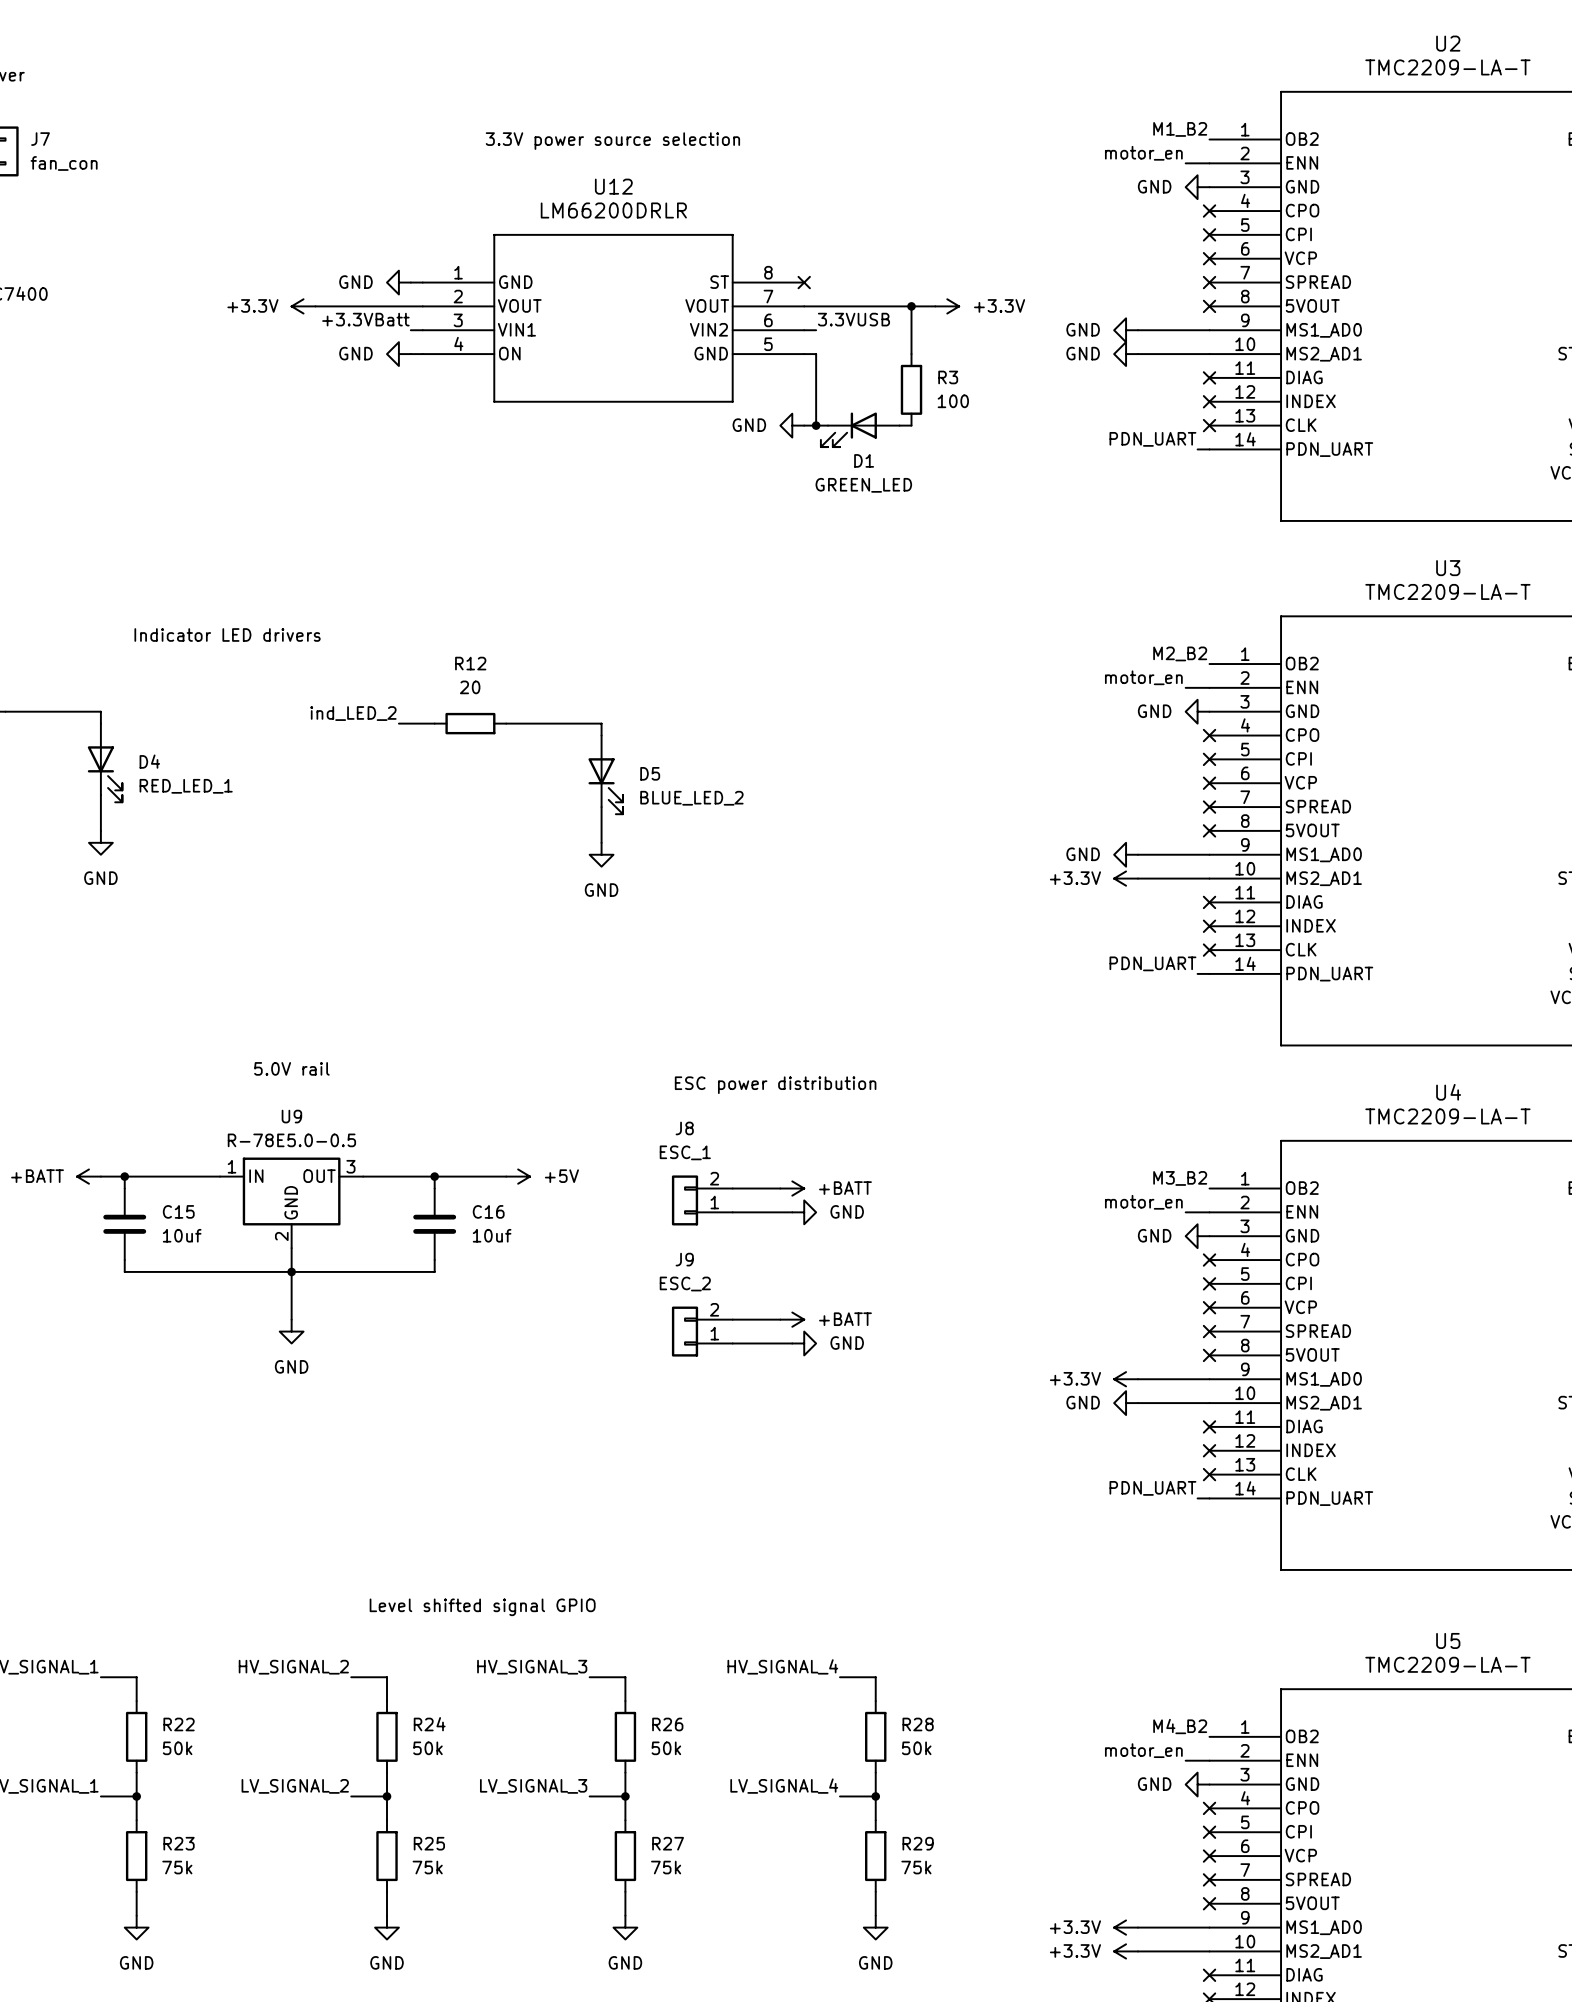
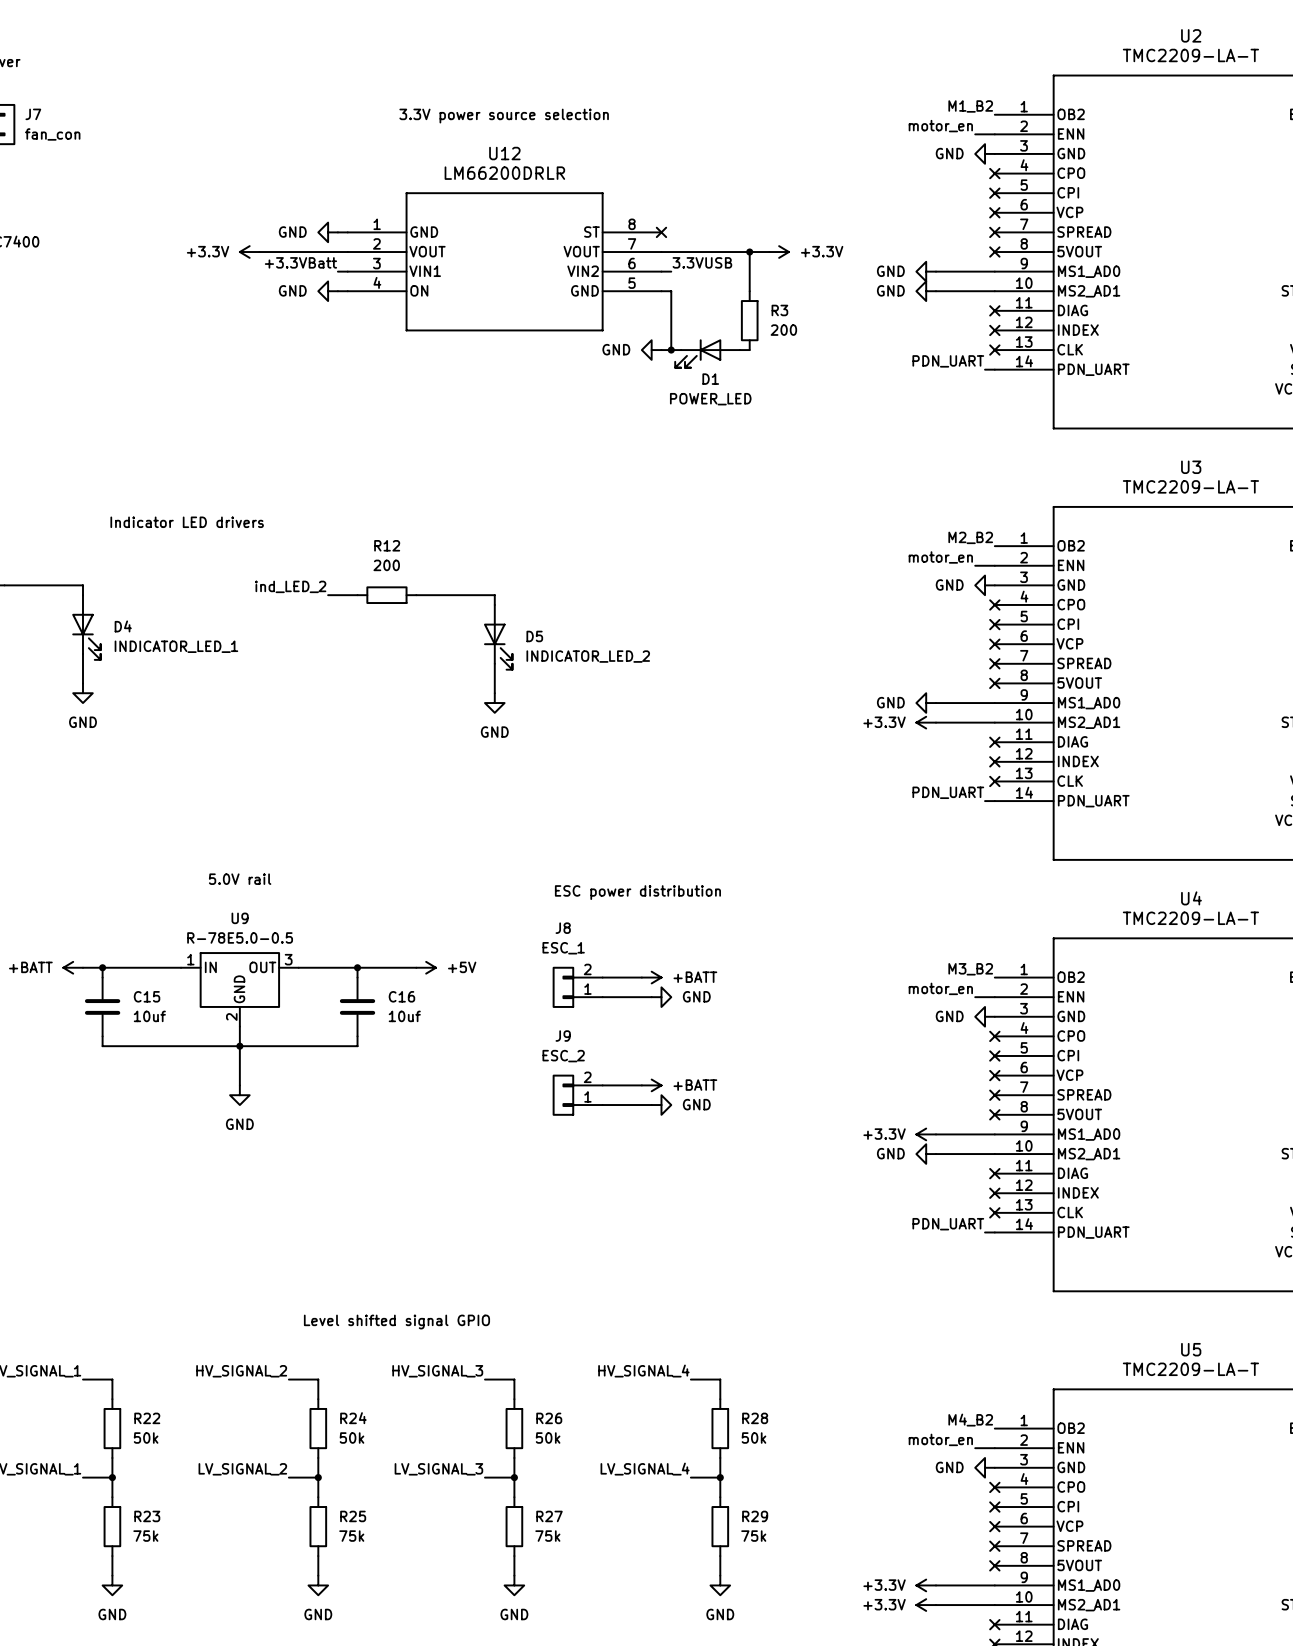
R3 value: 100 (953, 401) -> 200 (783, 330)
D1 value: GREEN_LED (863, 485) -> POWER_LED (710, 399)
R12 value: 20 (470, 687) -> 200 (386, 565)
D4 value: RED_LED_1 (186, 786) -> INDICATOR_LED_1 (176, 646)
D5 value: BLUE_LED_2 (691, 798) -> INDICATOR_LED_2 (588, 656)

